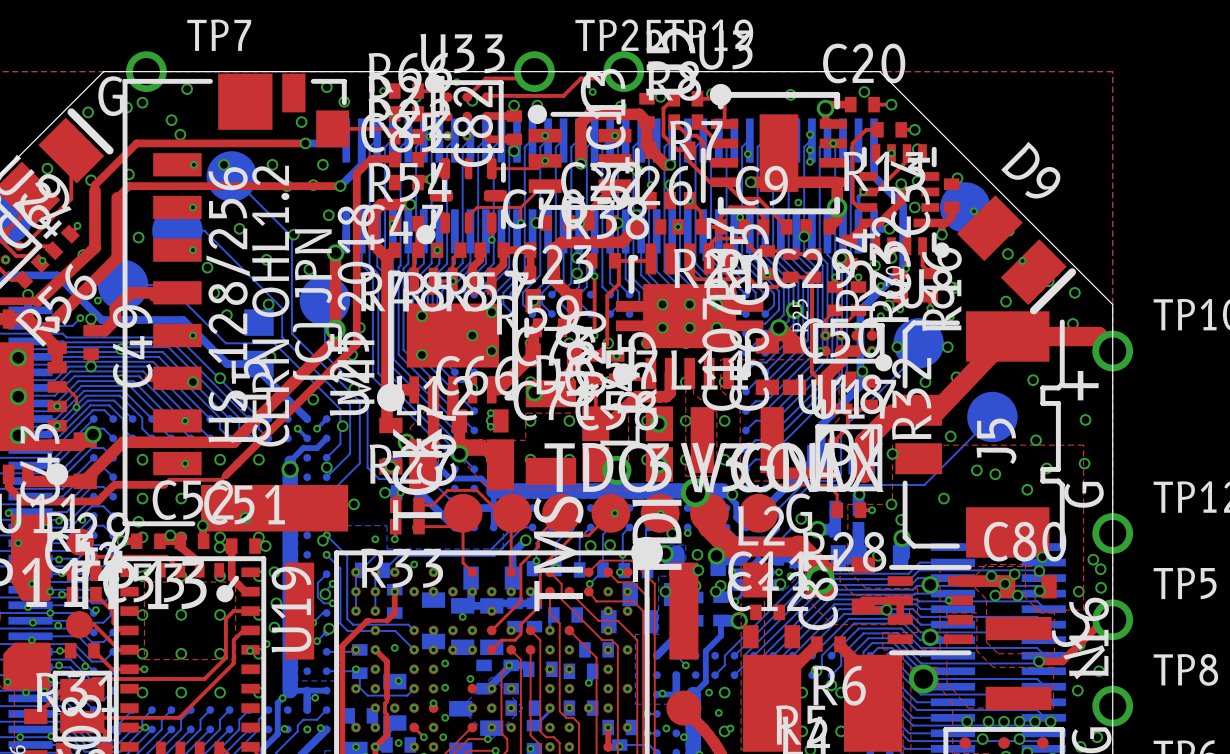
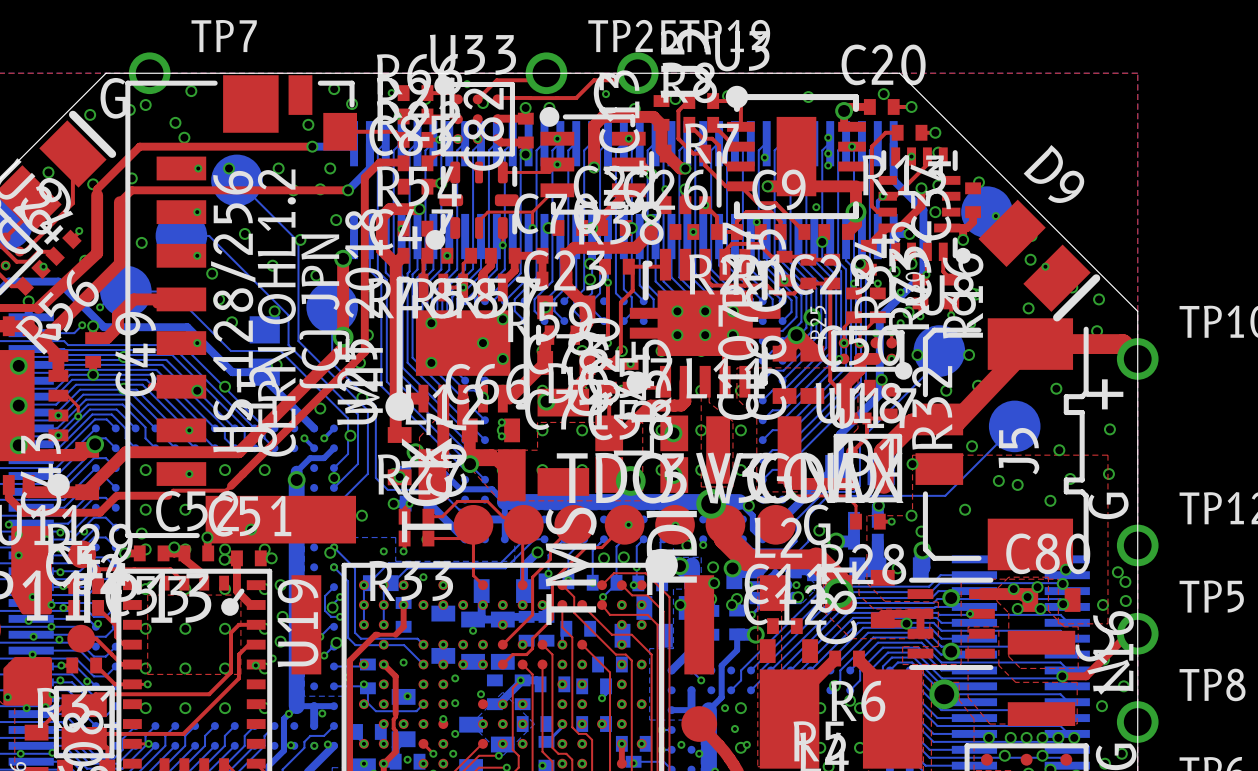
via: (662, 693) -> none

